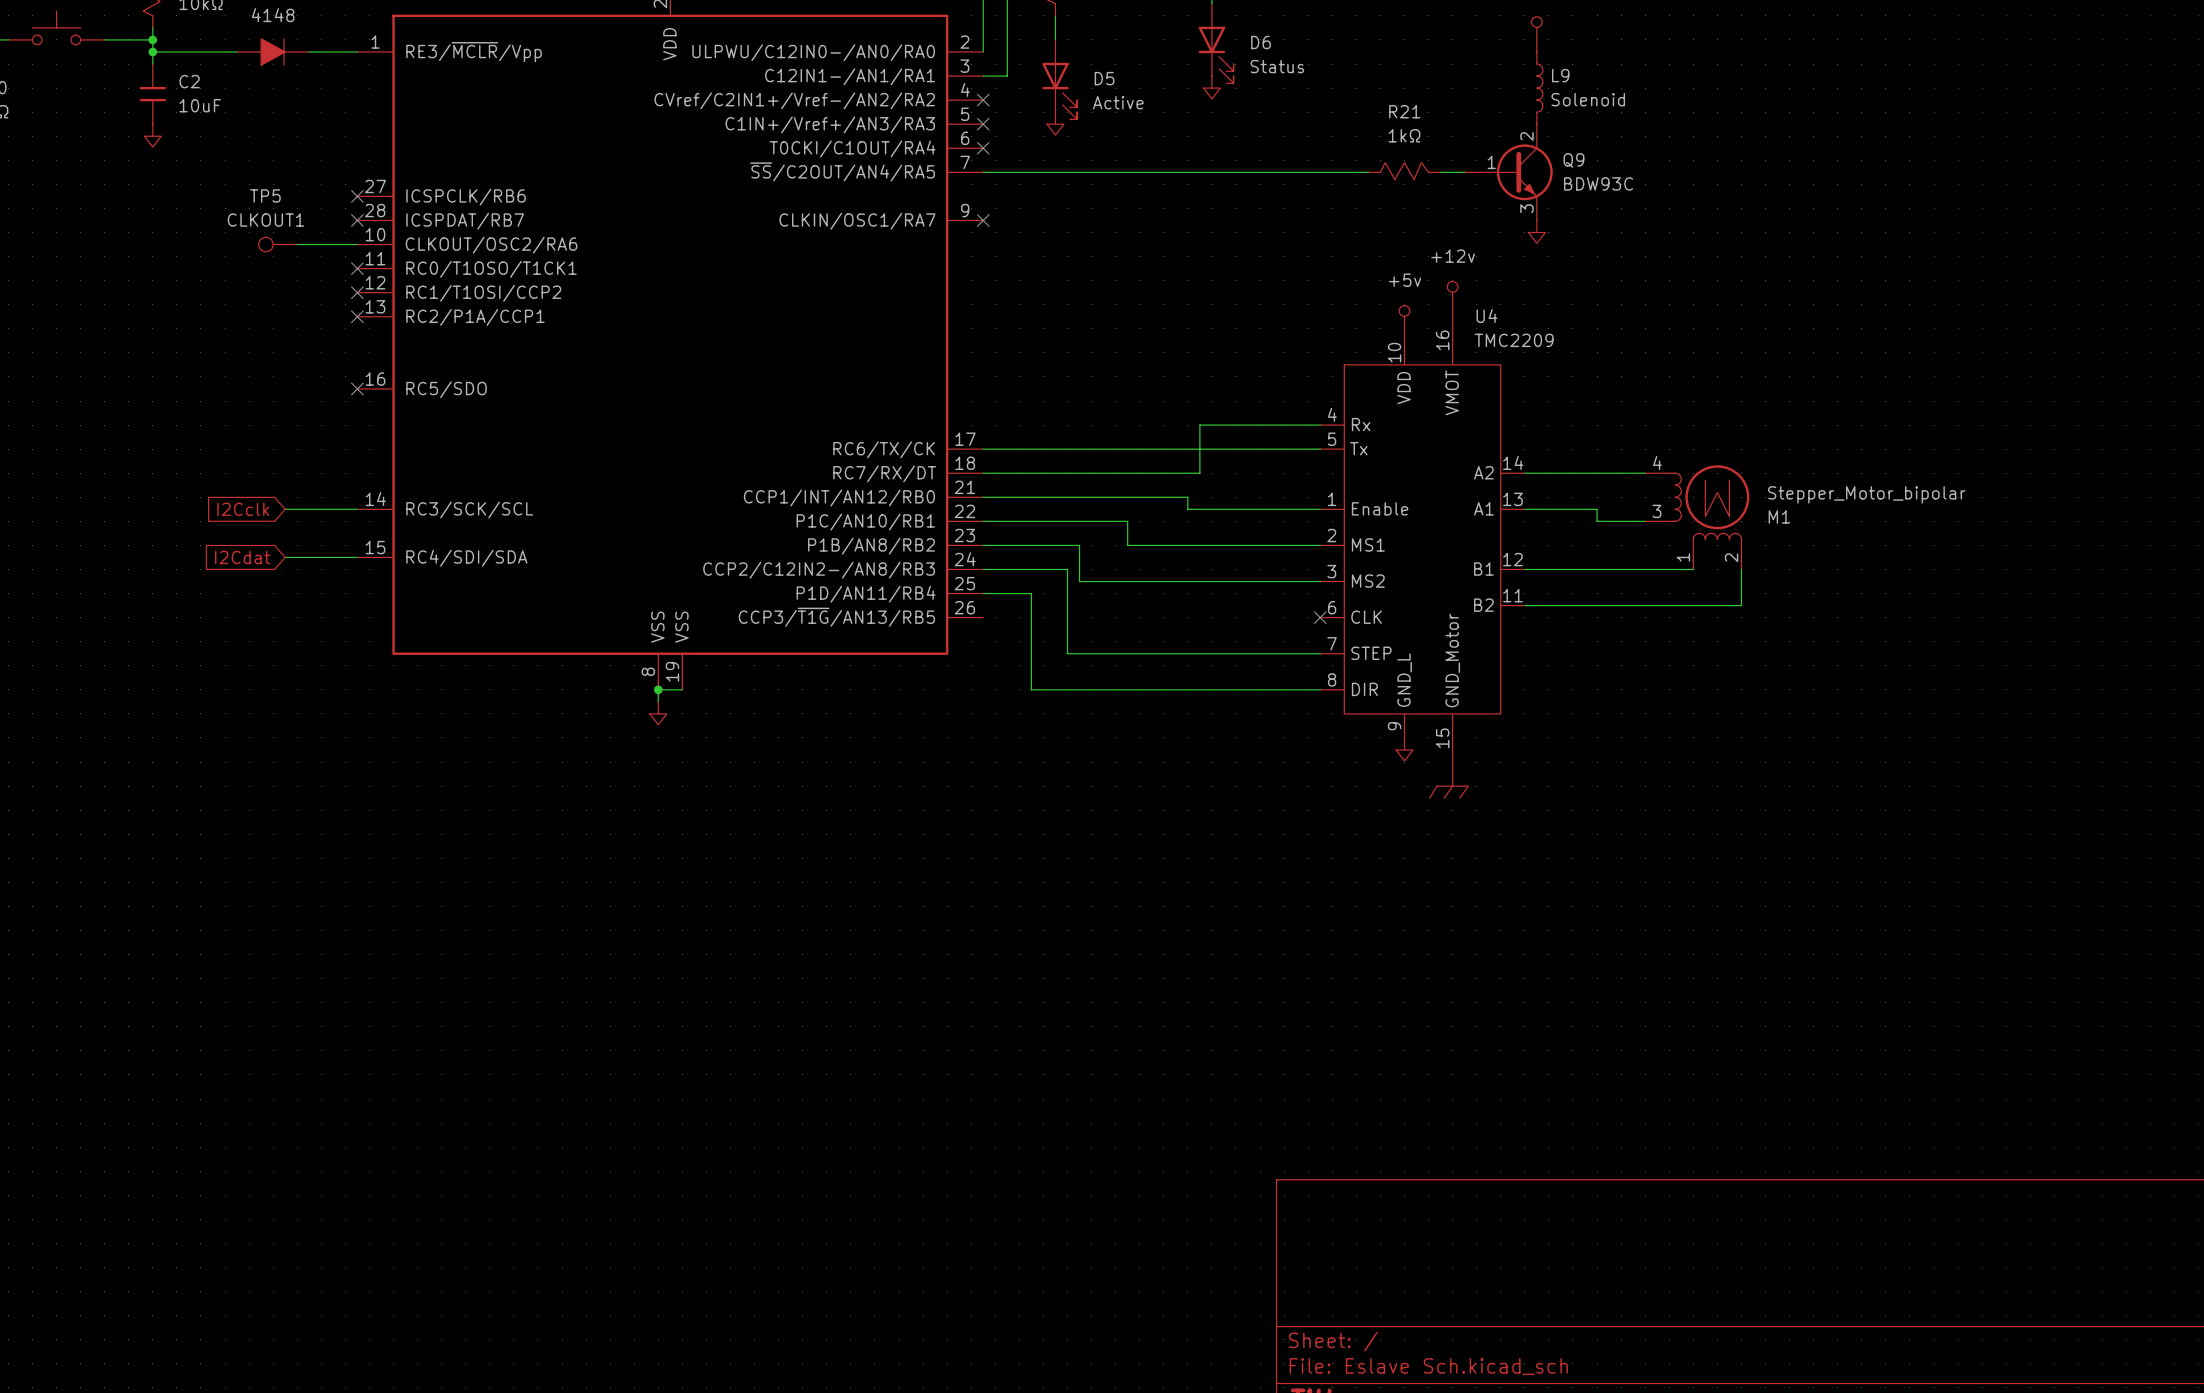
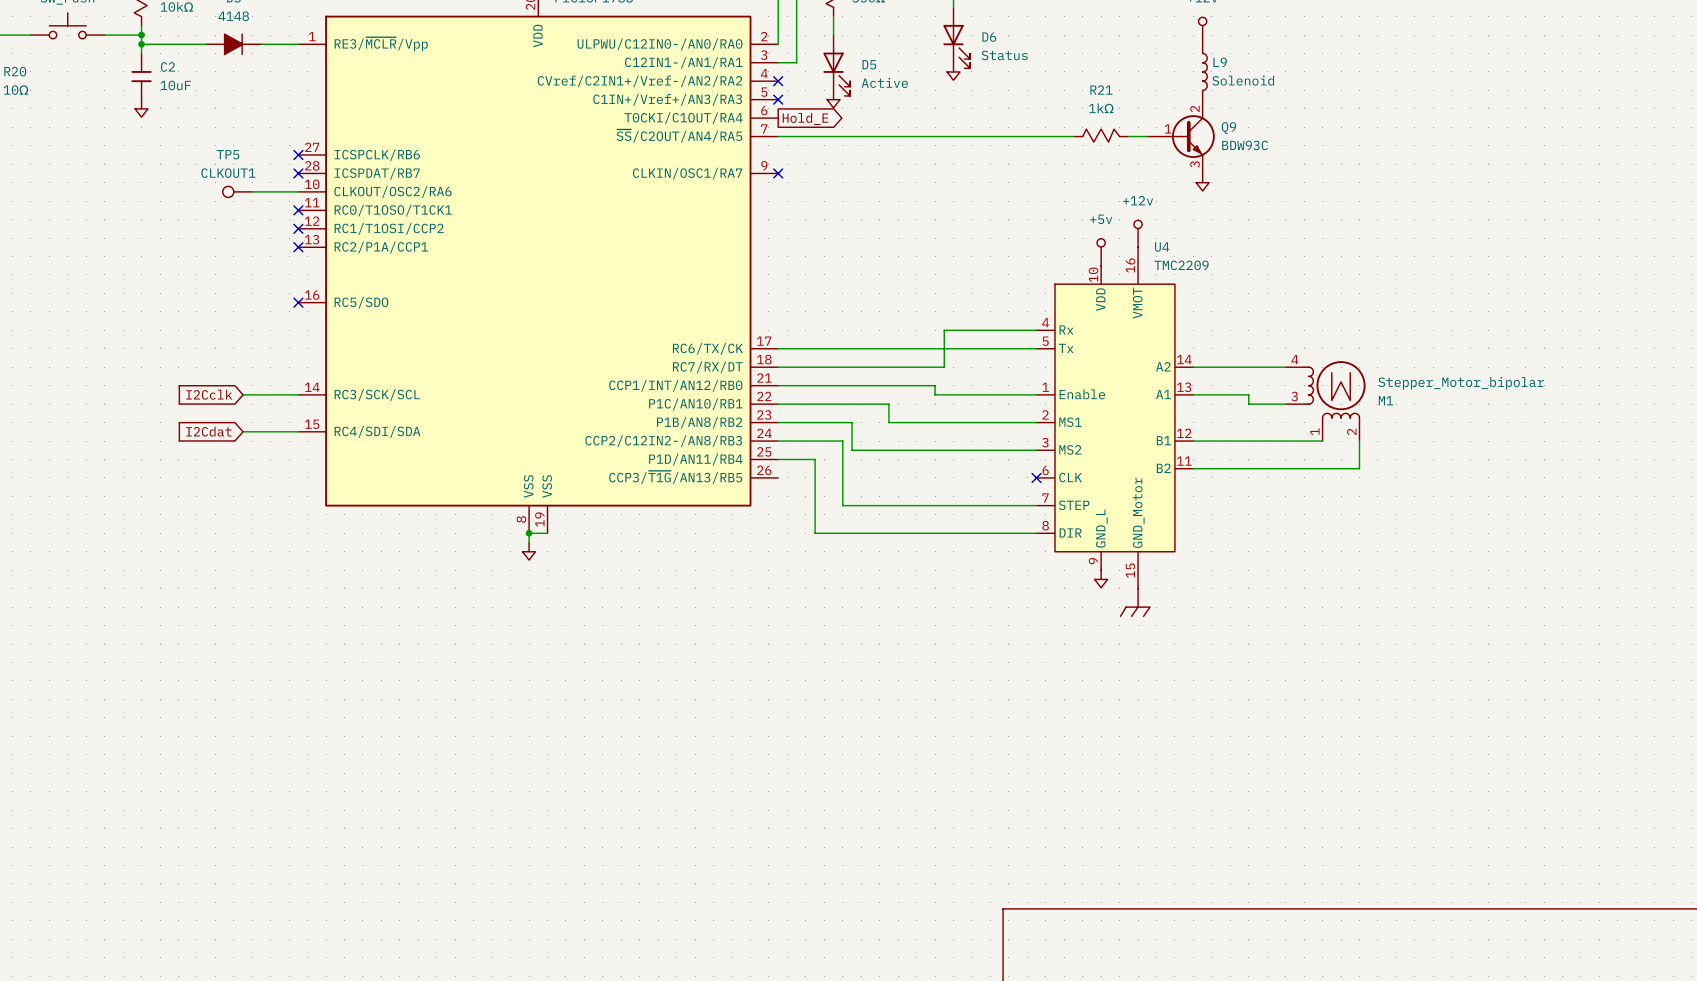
no-connect mark: (983, 148) -> none
global label: none -> Hold_E (805, 118)

